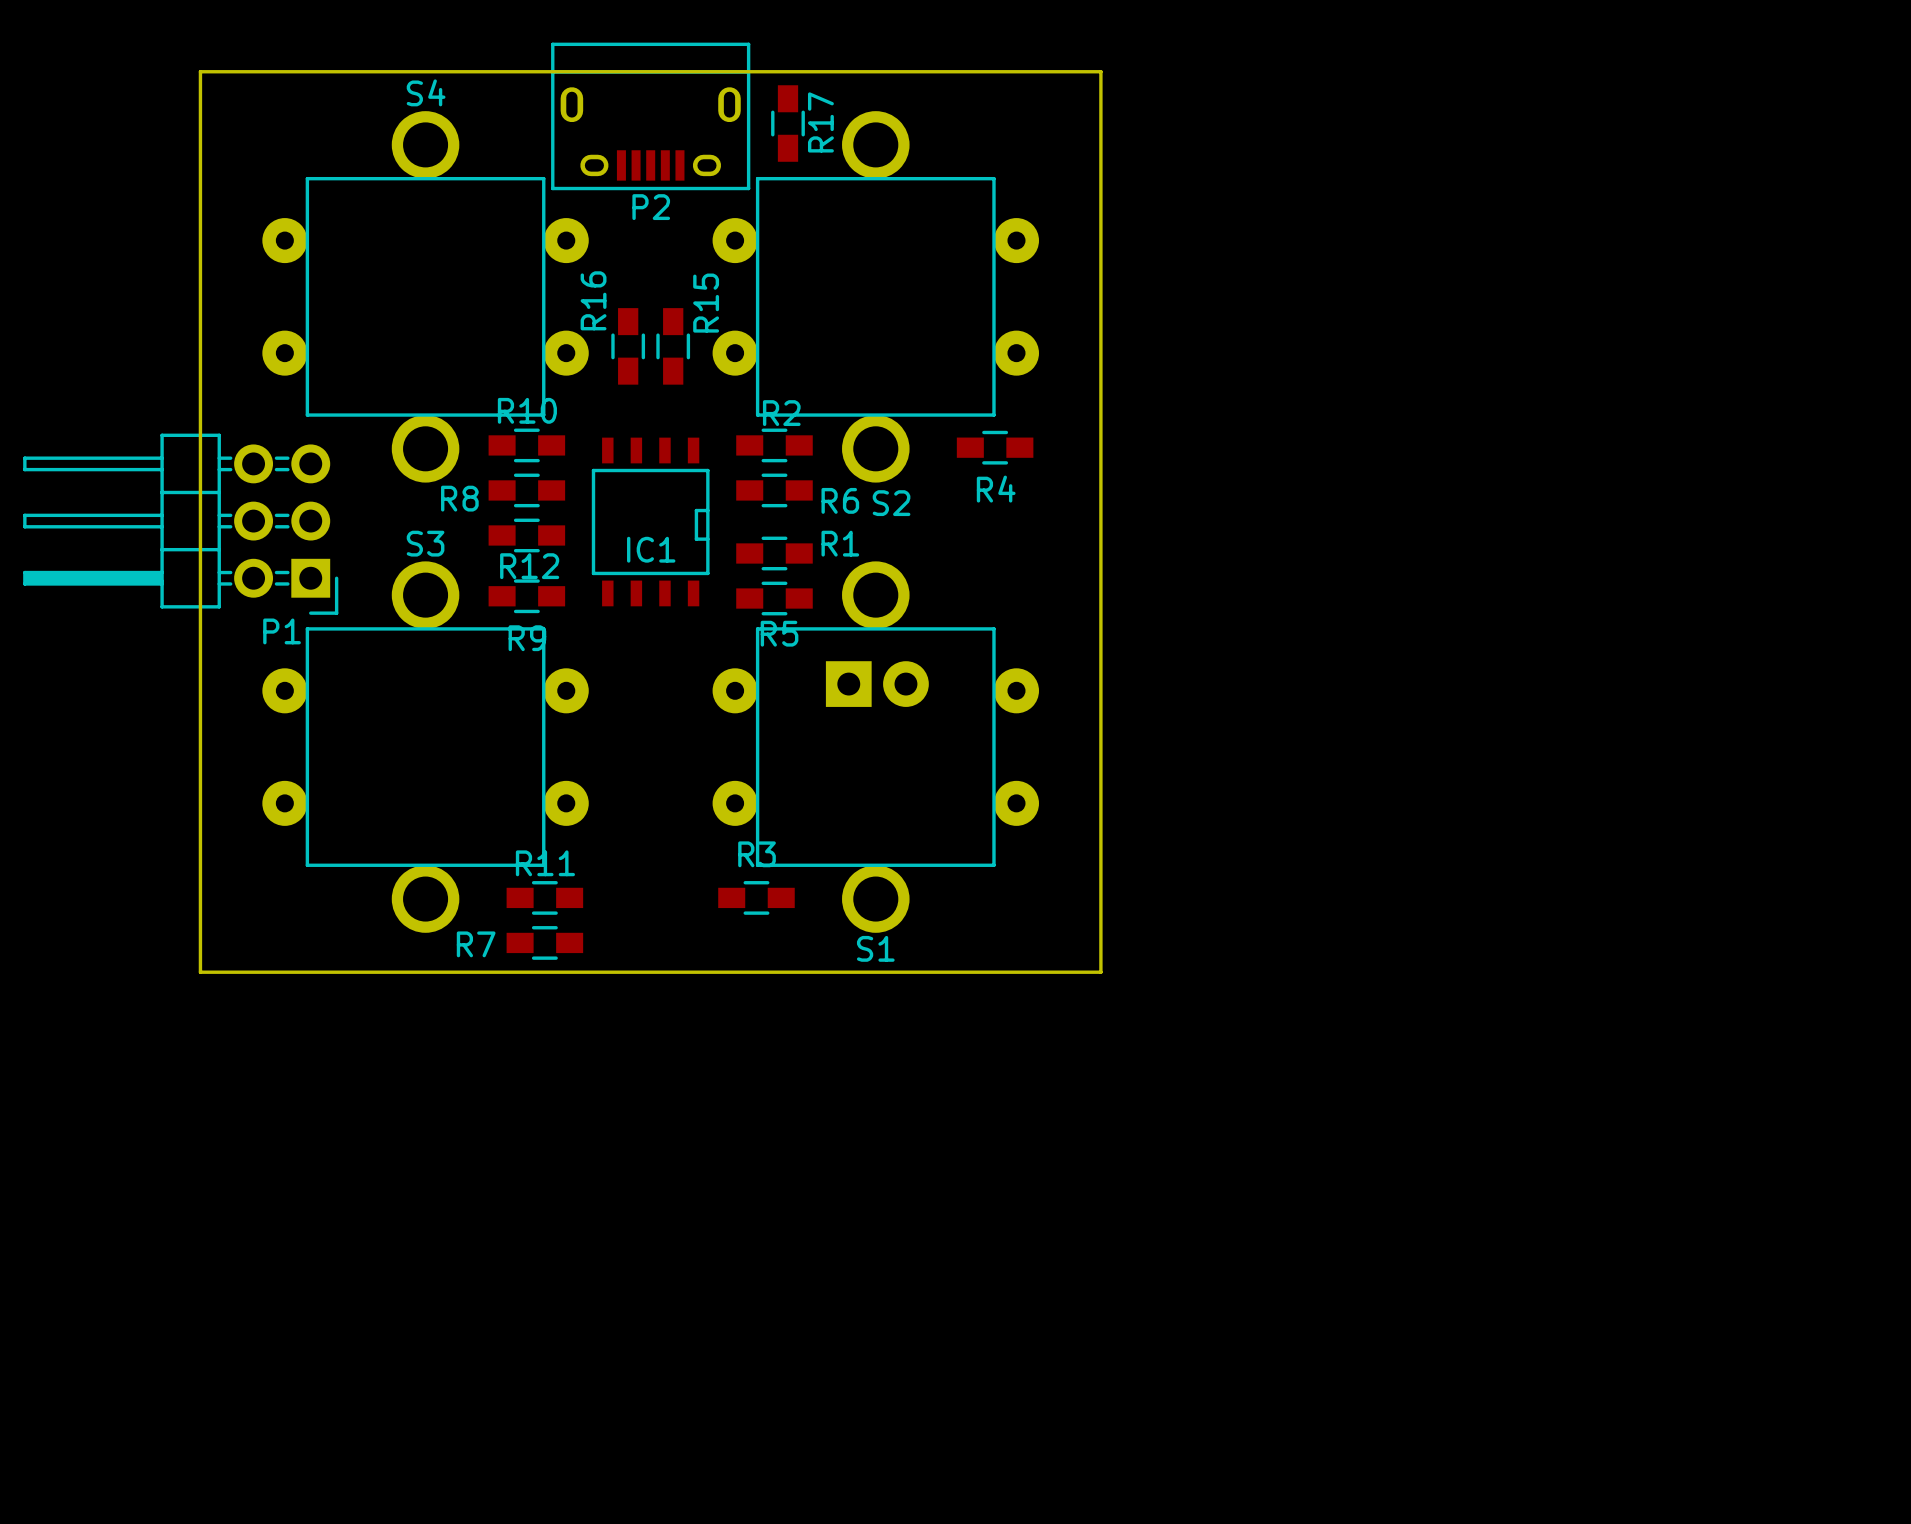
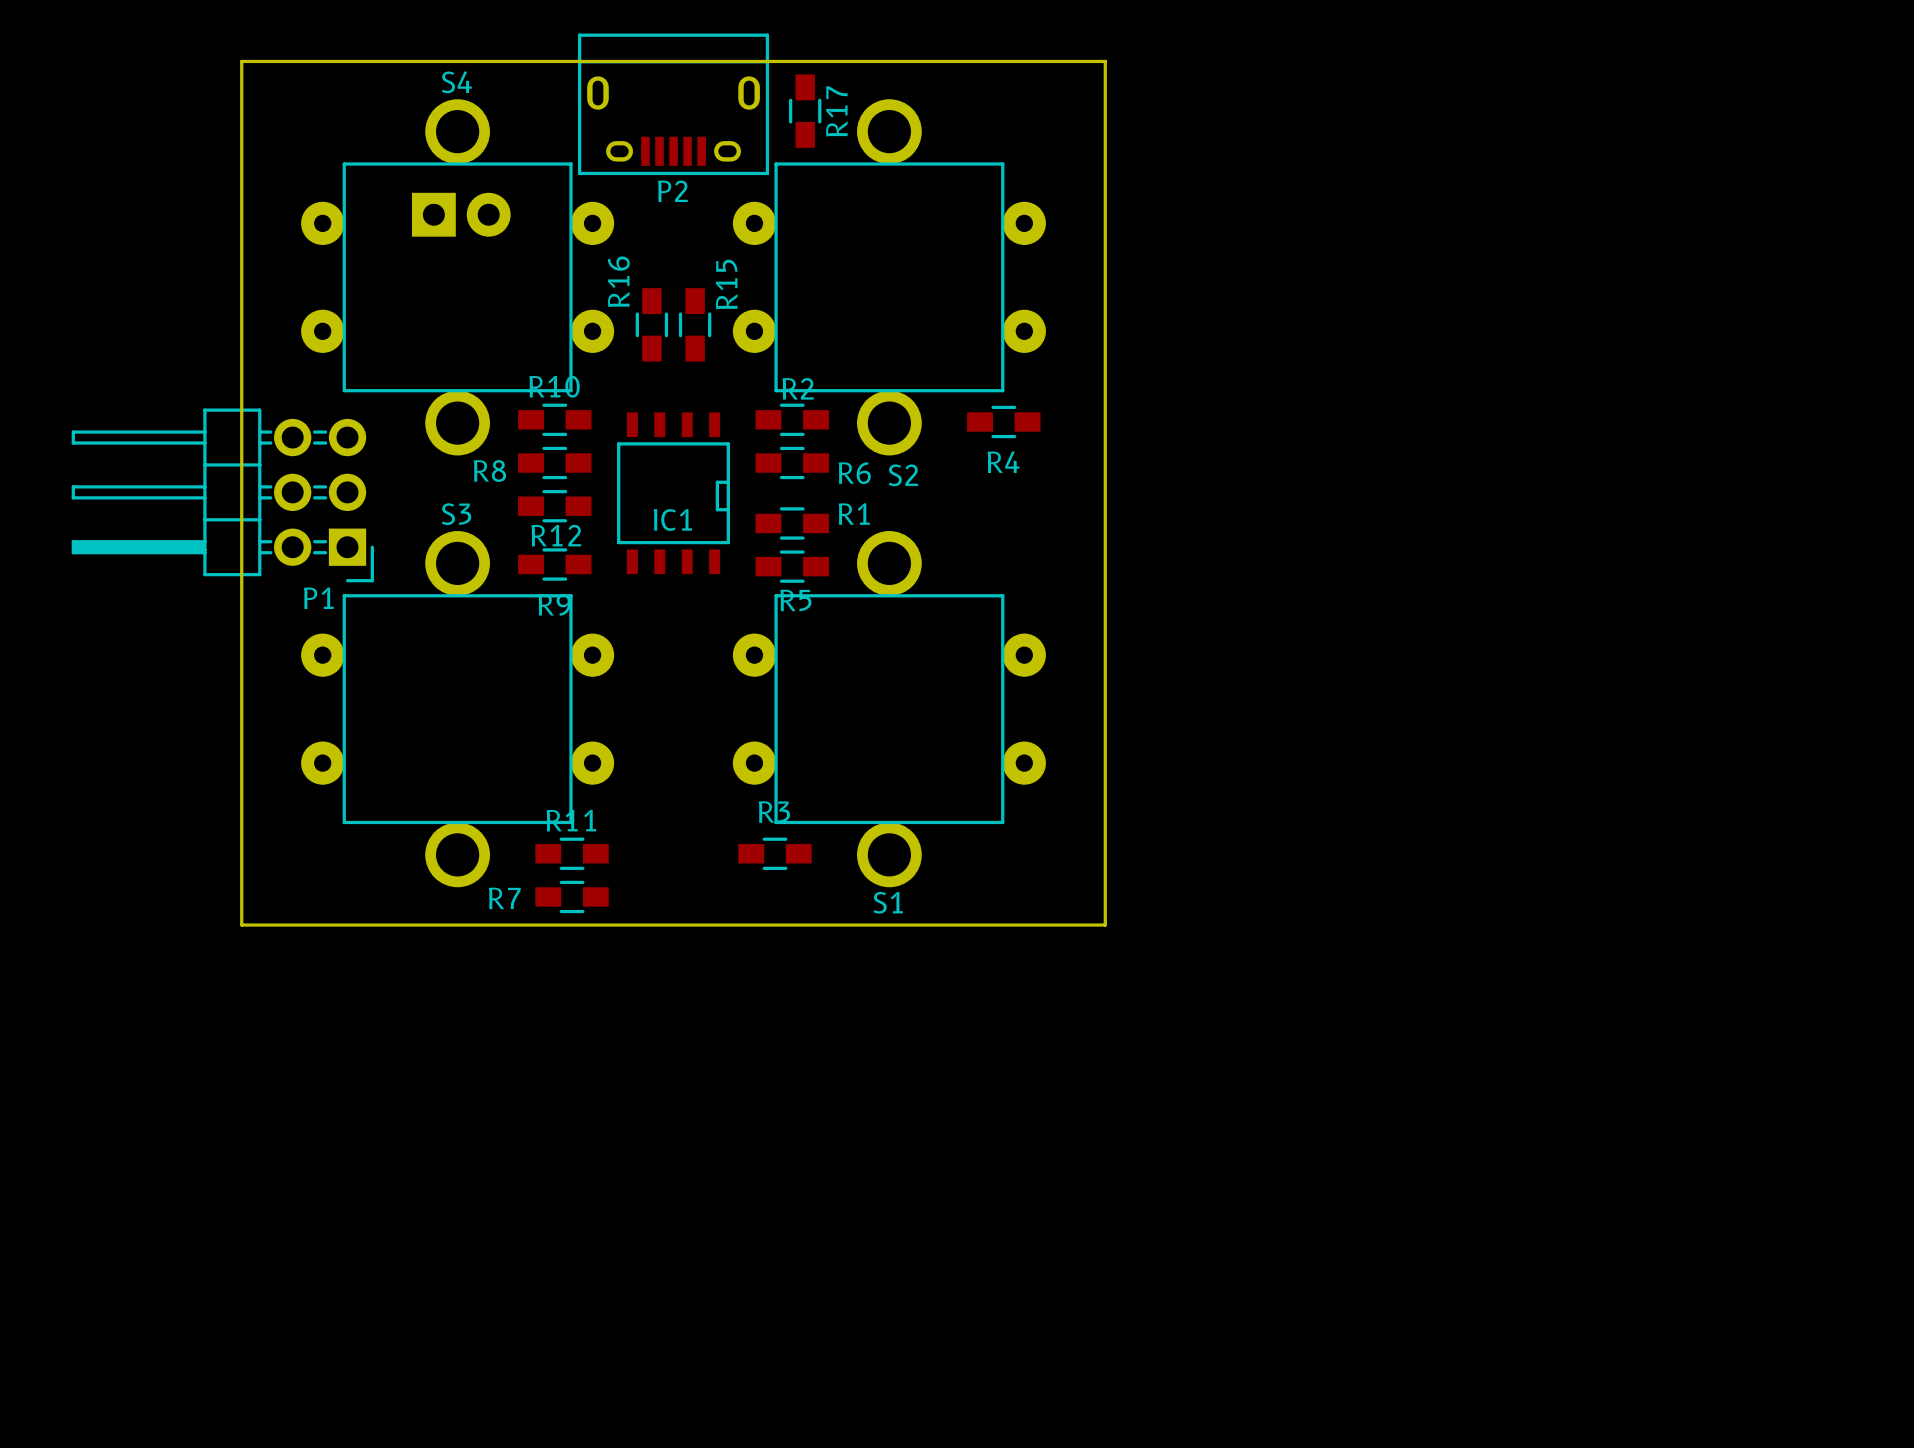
part: none -> (461, 214)
part: (877, 684) -> none

